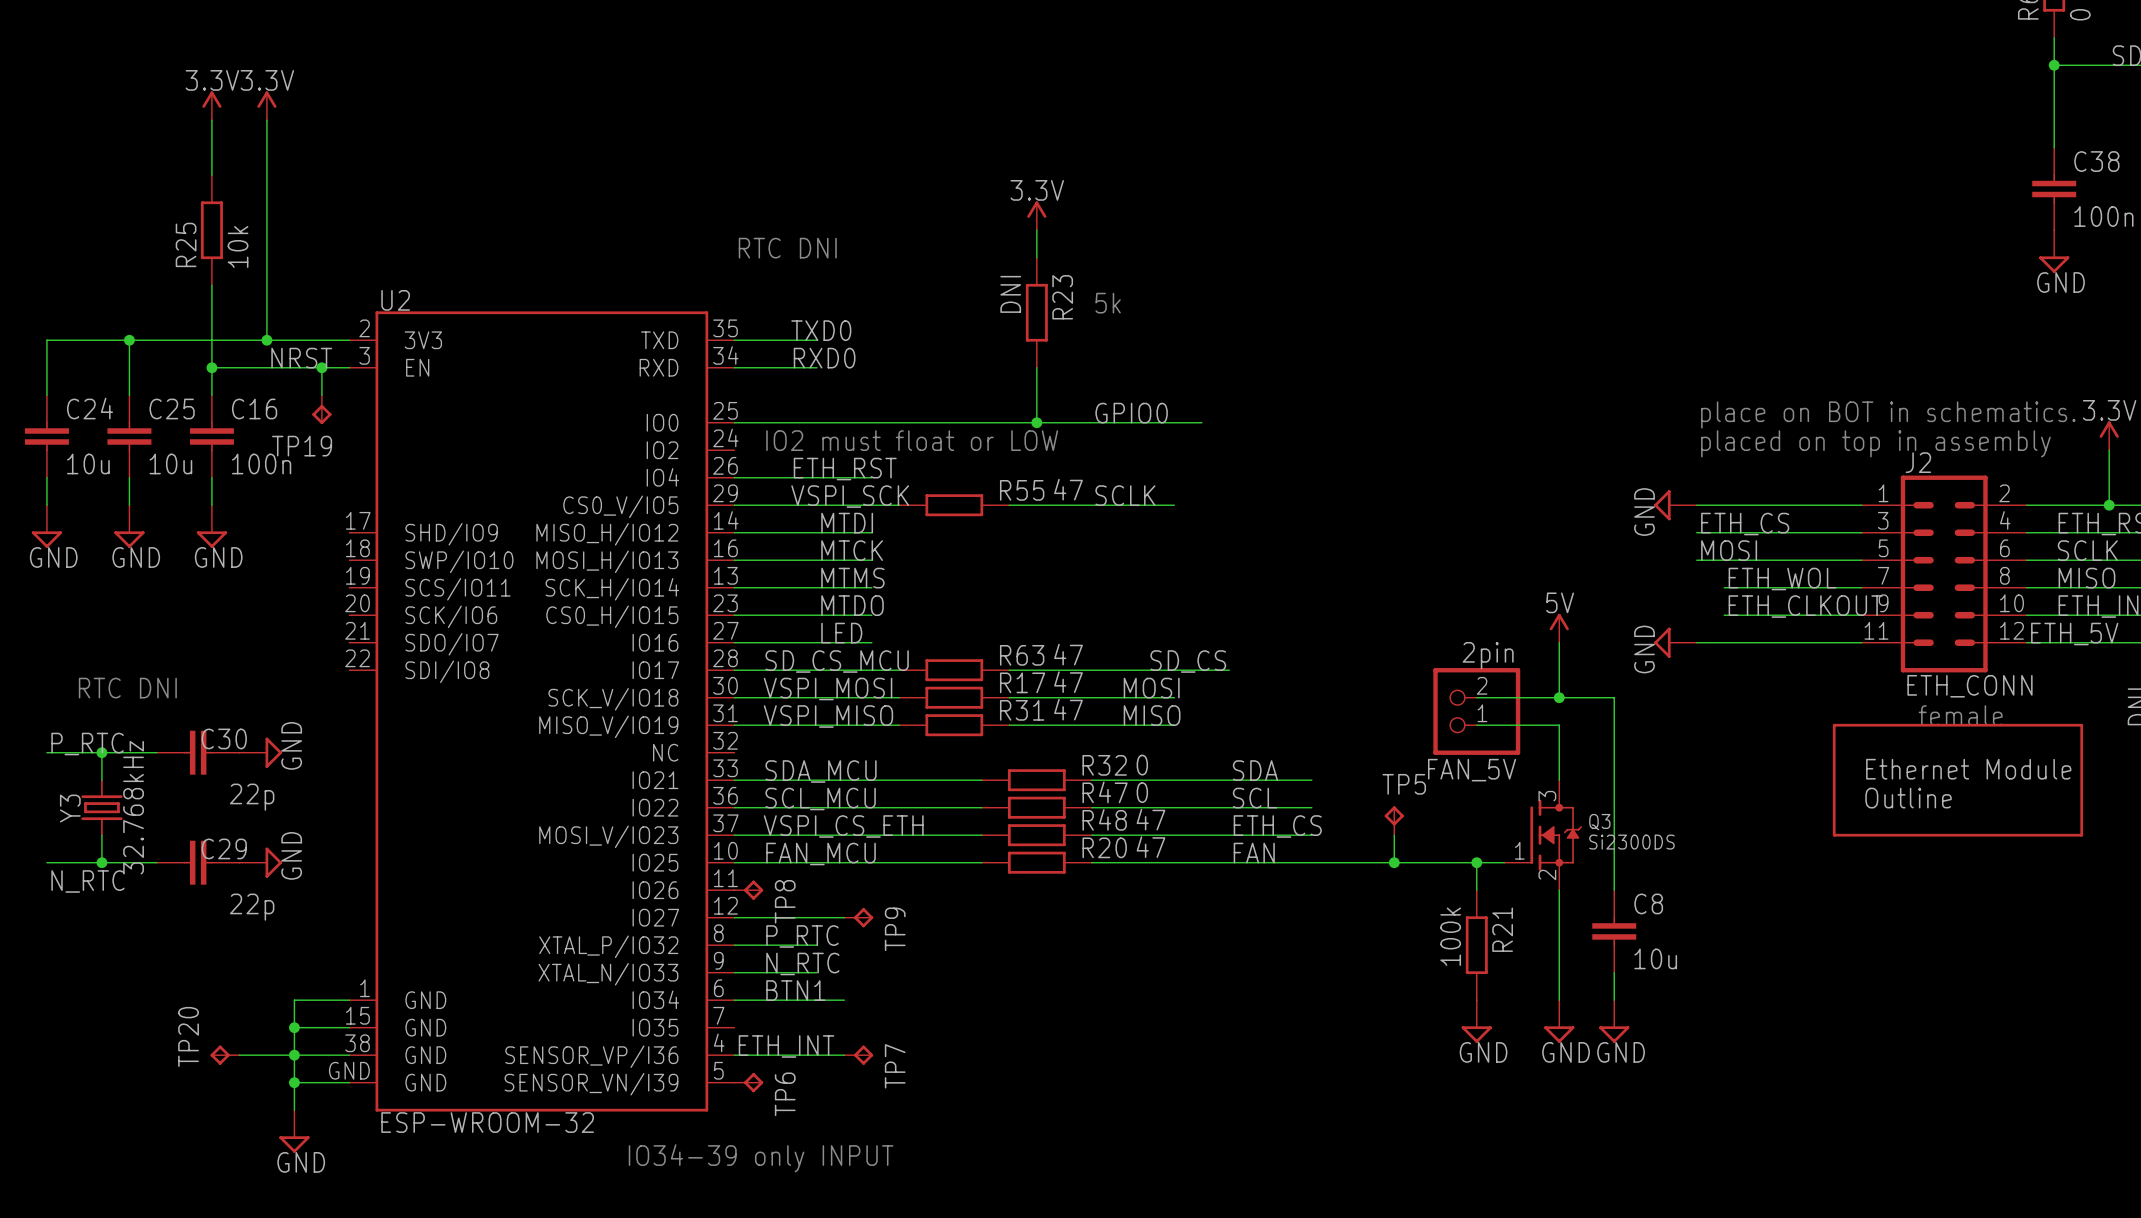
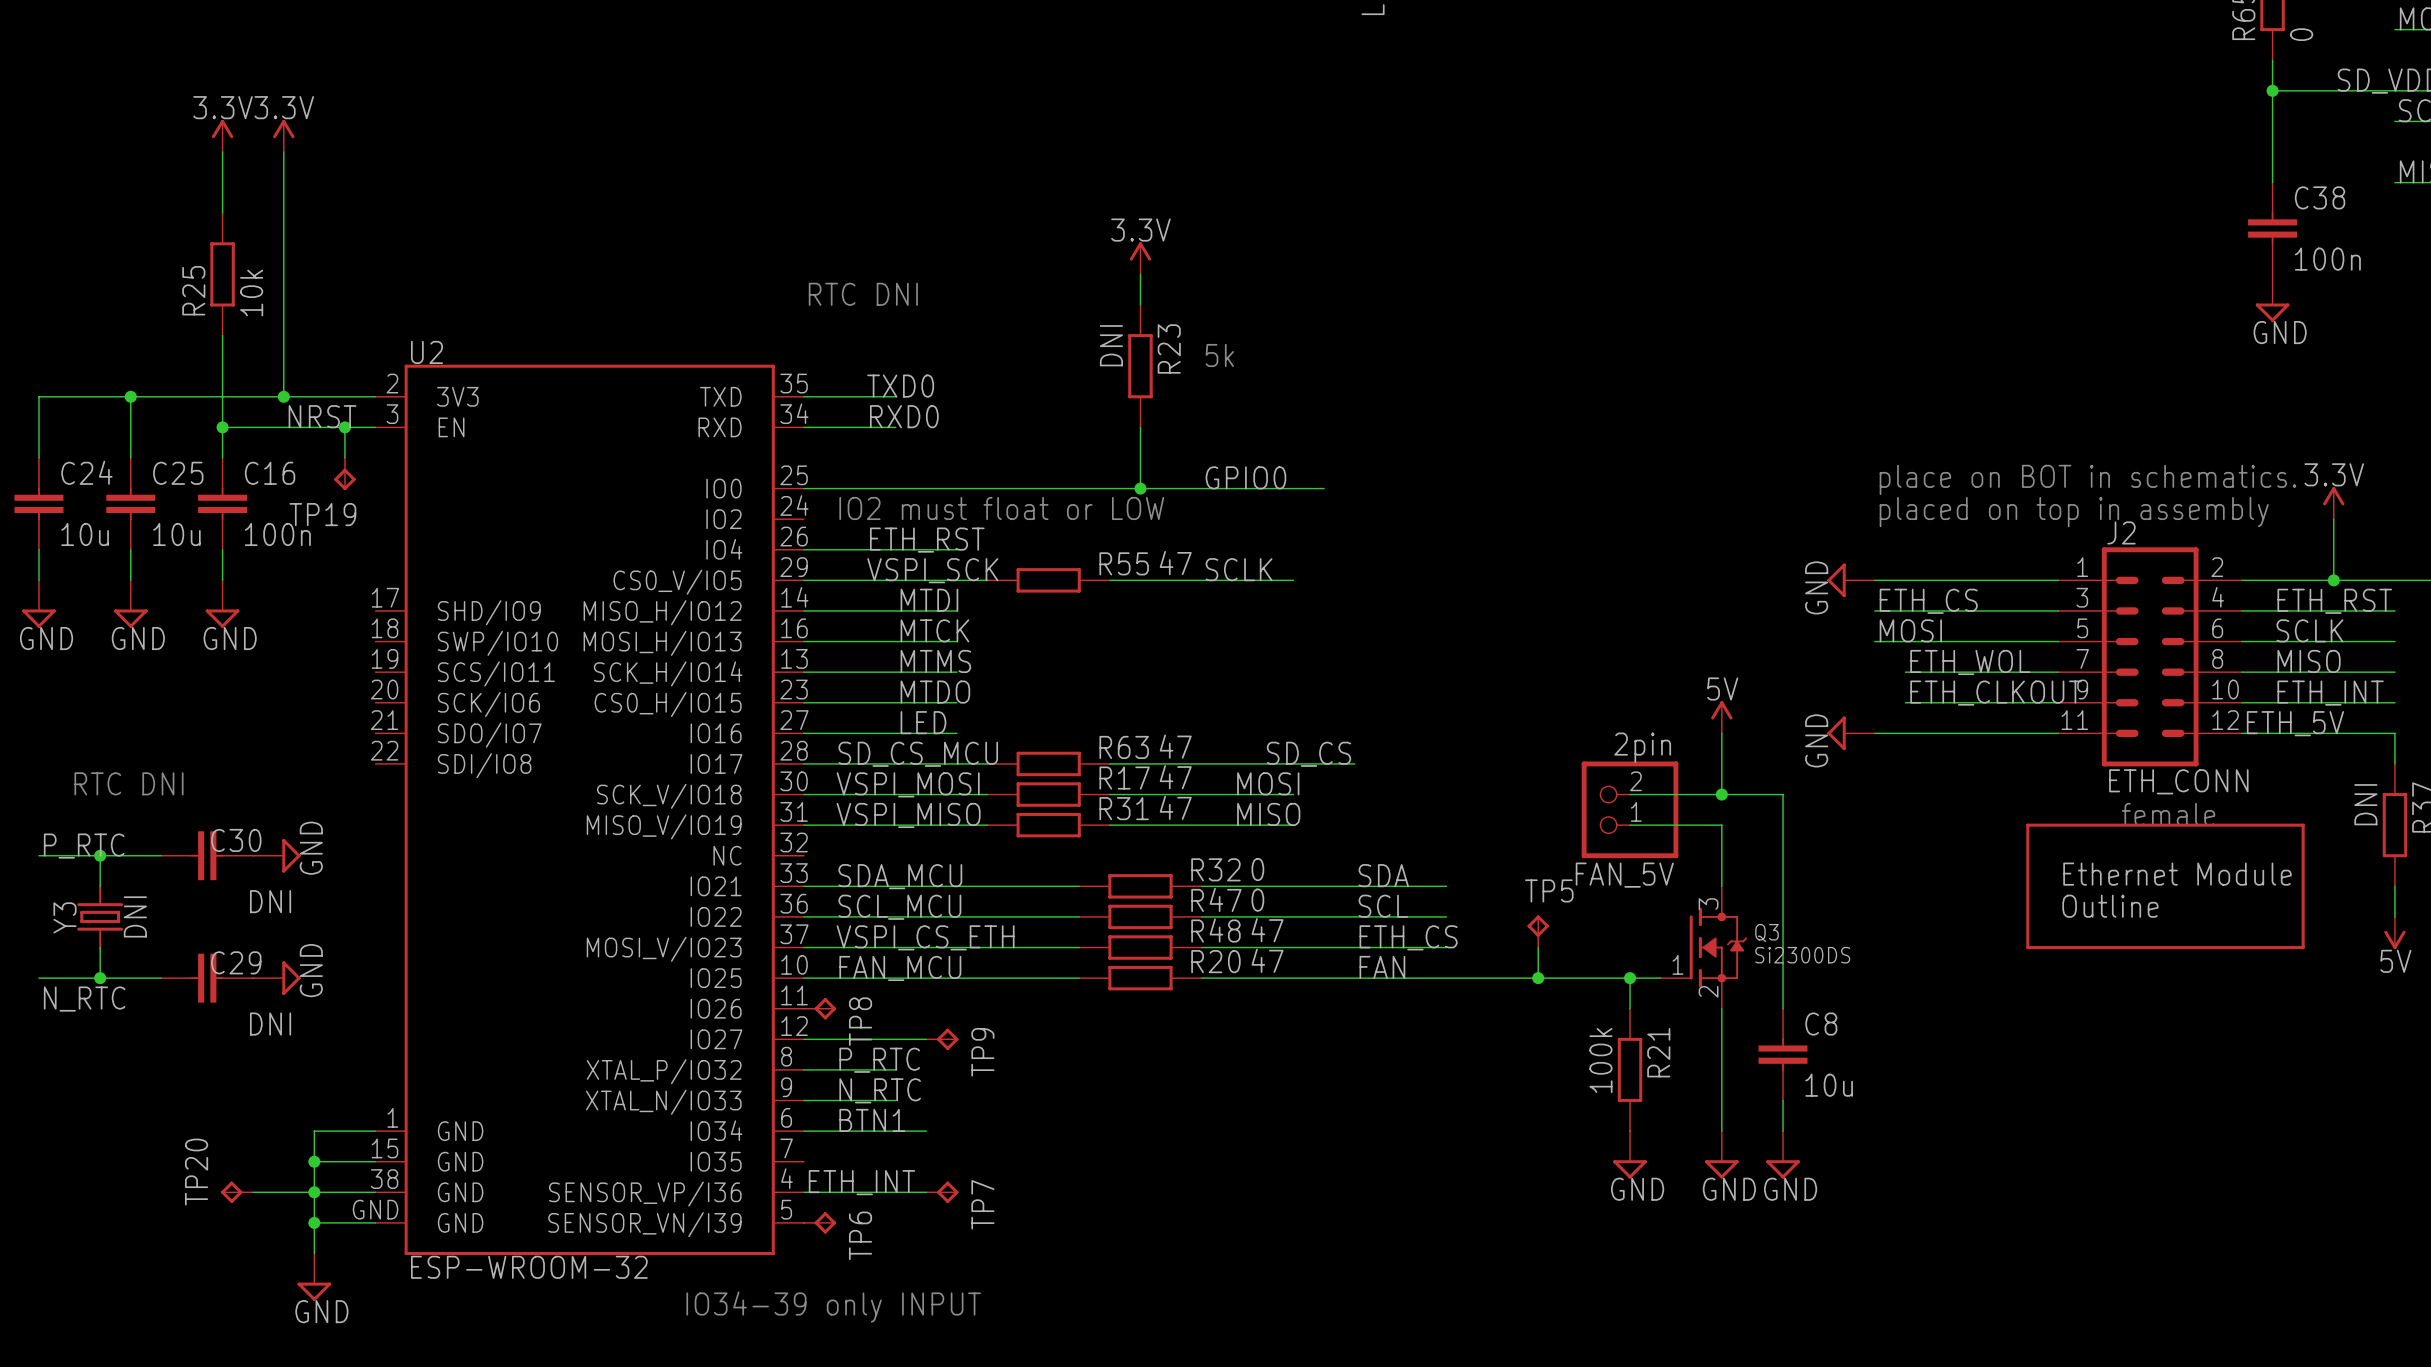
C30 value: 22p (252, 797) -> DNI (270, 901)
Y3 value: 32.768kHz (133, 807) -> DNI (135, 916)
C29 value: 22p (252, 907) -> DNI (270, 1024)

